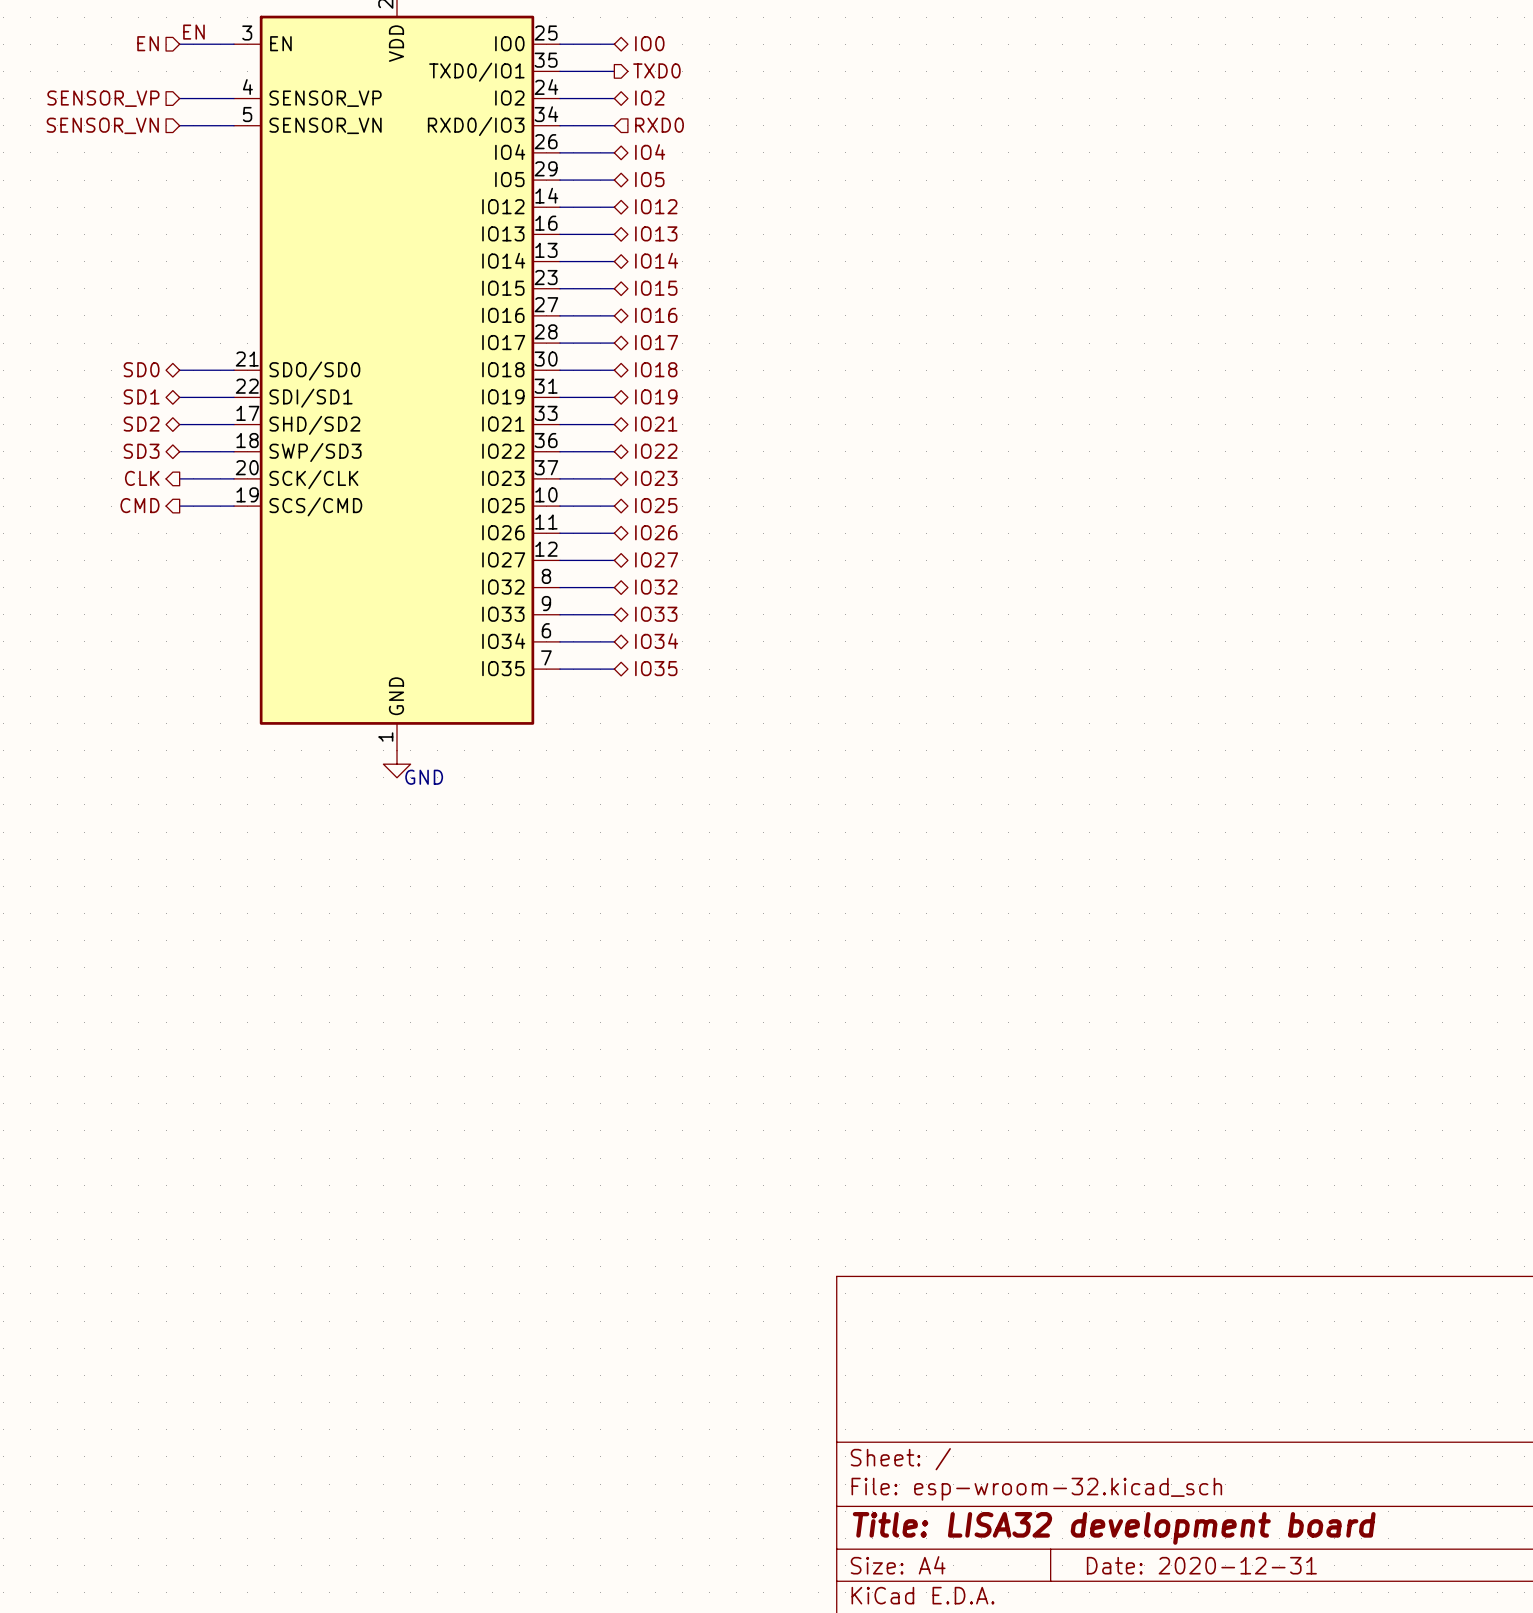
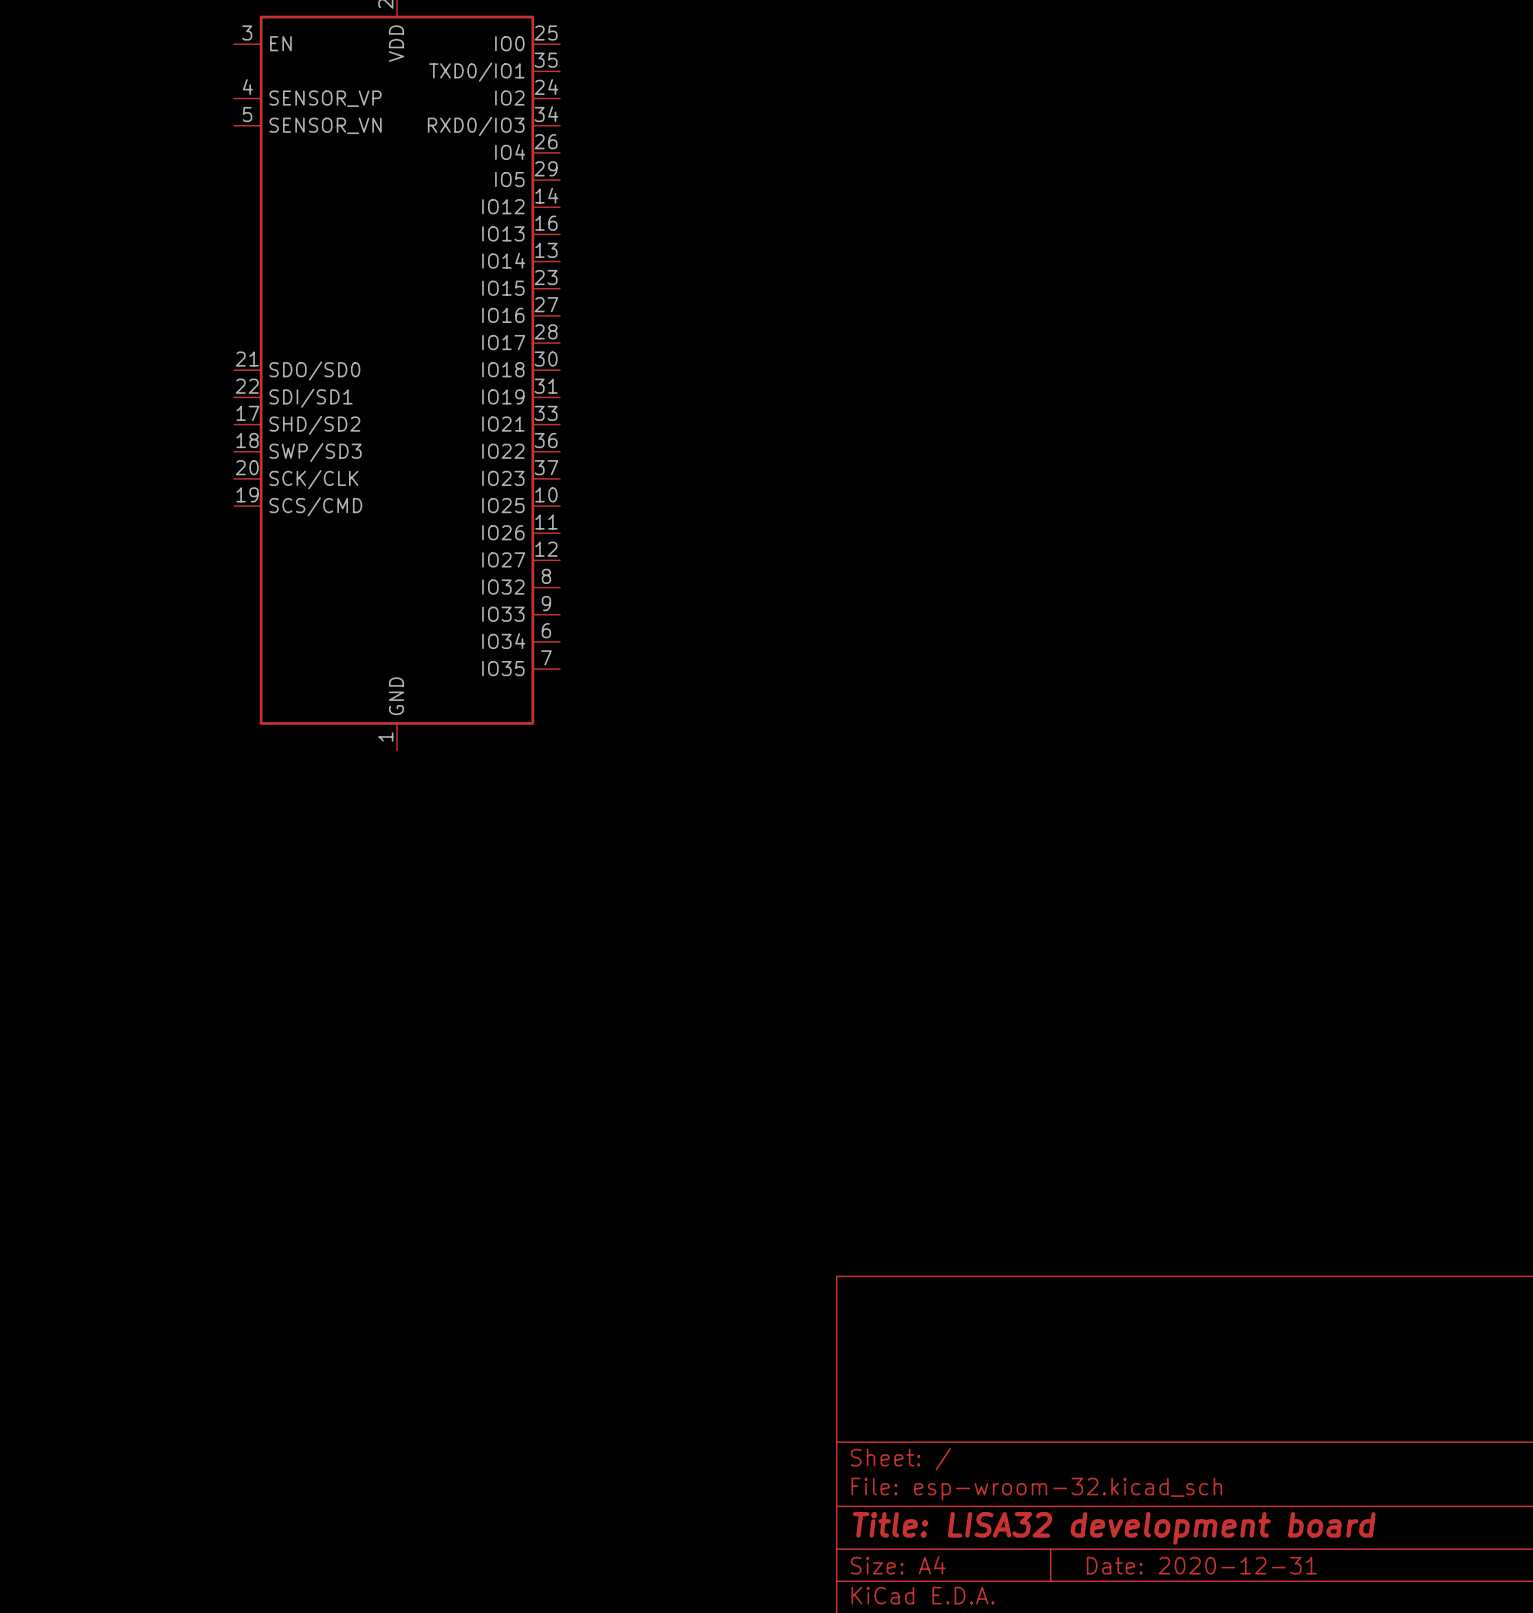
label: EN (193, 32) -> none
hierarchical label: EN (148, 43) -> none
hierarchical label: IO0 (649, 43) -> none
wire: (179, 44) (233, 44) -> none
wire: (560, 44) (614, 44) -> none
hierarchical label: TXD0 (656, 70) -> none
wire: (560, 71) (614, 71) -> none
hierarchical label: SENSOR_VP (103, 98) -> none
wire: (179, 98) (233, 98) -> none
wire: (560, 98) (614, 98) -> none
hierarchical label: IO2 (649, 98) -> none
hierarchical label: SENSOR_VN (102, 125) -> none
wire: (179, 125) (233, 125) -> none
wire: (560, 125) (614, 125) -> none
hierarchical label: RXD0 (659, 125) -> none
wire: (560, 152) (614, 152) -> none
hierarchical label: IO4 (650, 152) -> none
hierarchical label: IO5 (649, 179) -> none
wire: (560, 180) (614, 180) -> none
hierarchical label: IO12 (656, 206) -> none
wire: (560, 207) (614, 207) -> none
hierarchical label: IO13 (656, 233) -> none
wire: (560, 234) (614, 234) -> none
hierarchical label: IO14 (656, 260) -> none
wire: (560, 261) (614, 261) -> none
wire: (560, 288) (614, 288) -> none
hierarchical label: IO15 (656, 288) -> none
wire: (560, 315) (614, 315) -> none
hierarchical label: IO16 (656, 315) -> none
hierarchical label: IO17 (656, 342) -> none
wire: (560, 343) (614, 343) -> none
hierarchical label: SD0 (141, 369) -> none
hierarchical label: IO18 (656, 369) -> none
wire: (179, 370) (233, 370) -> none
wire: (560, 370) (614, 370) -> none
hierarchical label: SD1 (141, 396) -> none
hierarchical label: IO19 (656, 396) -> none
wire: (179, 397) (233, 397) -> none
wire: (560, 397) (614, 397) -> none
hierarchical label: SD2 (141, 424) -> none
wire: (179, 424) (233, 424) -> none
wire: (560, 424) (614, 424) -> none
hierarchical label: IO21 (656, 424) -> none
hierarchical label: SD3 (141, 451) -> none
wire: (179, 451) (233, 451) -> none
wire: (560, 451) (614, 451) -> none
hierarchical label: IO22 (656, 451) -> none
hierarchical label: CLK (142, 478) -> none
wire: (179, 478) (233, 478) -> none
wire: (560, 478) (614, 478) -> none
hierarchical label: IO23 (656, 478) -> none
hierarchical label: CMD (139, 505) -> none
hierarchical label: IO25 (656, 505) -> none
wire: (179, 506) (233, 506) -> none
wire: (560, 506) (614, 506) -> none
hierarchical label: IO26 (656, 532) -> none
wire: (560, 533) (614, 533) -> none
hierarchical label: IO27 (656, 559) -> none
wire: (560, 560) (614, 560) -> none
wire: (560, 587) (614, 587) -> none
hierarchical label: IO32 (656, 587) -> none
wire: (560, 614) (614, 614) -> none
hierarchical label: IO33 (656, 614) -> none
wire: (560, 641) (614, 641) -> none
hierarchical label: IO34 (656, 641) -> none
hierarchical label: IO35 (656, 668) -> none
wire: (560, 669) (614, 669) -> none
power symbol: GND (397, 764) -> none

